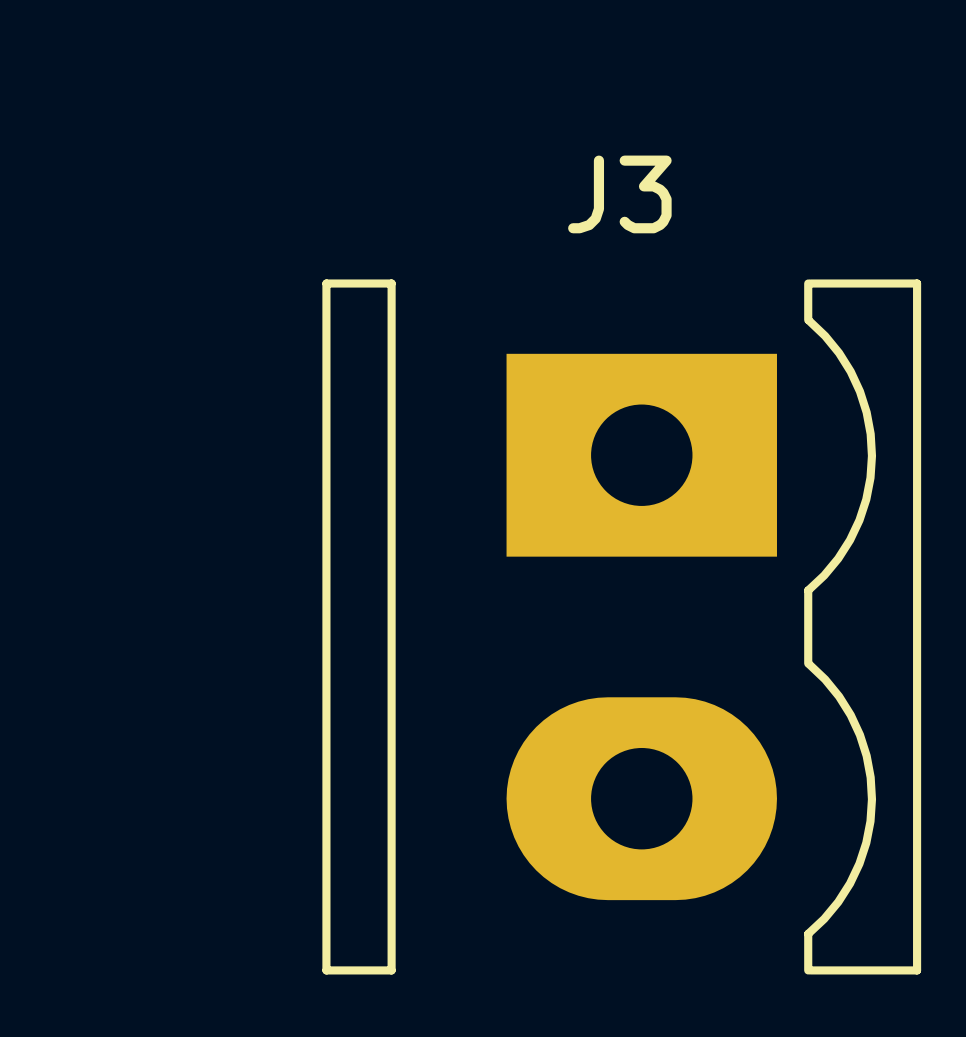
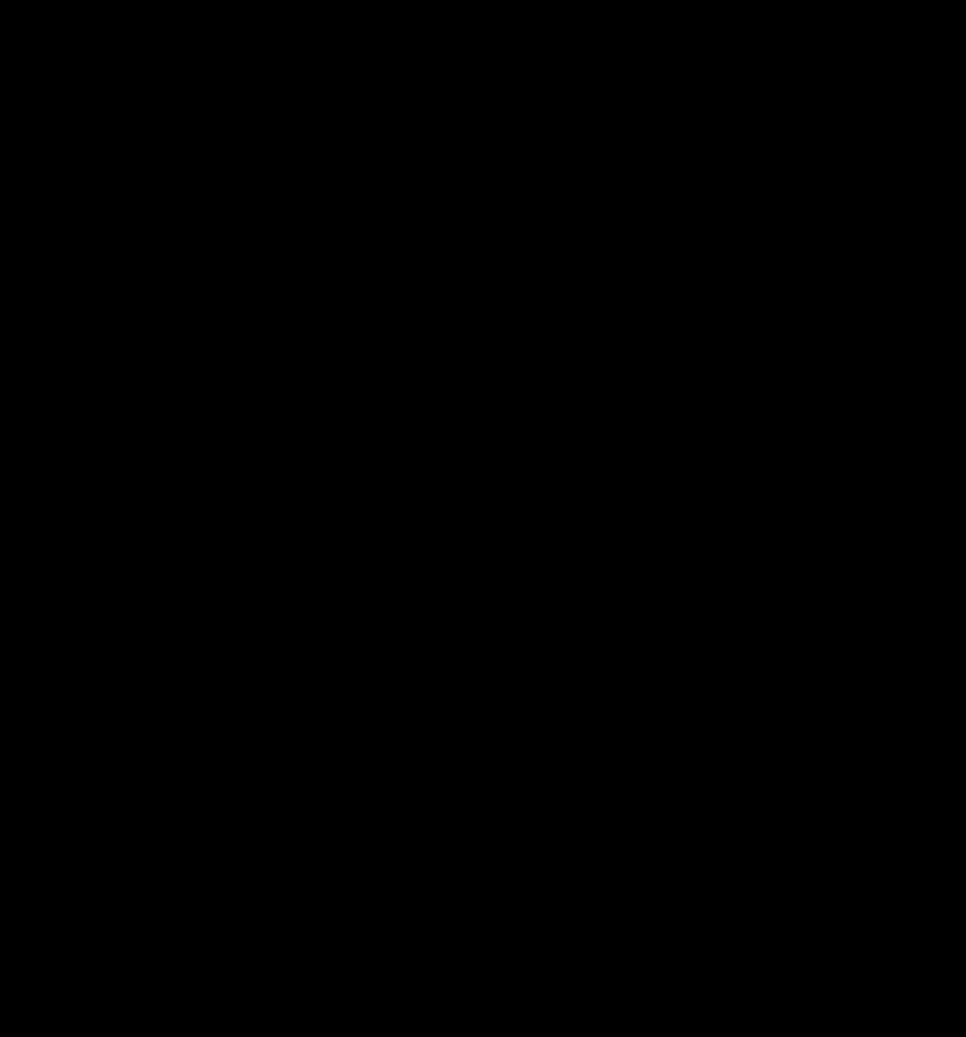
J3: (621, 626) -> none

